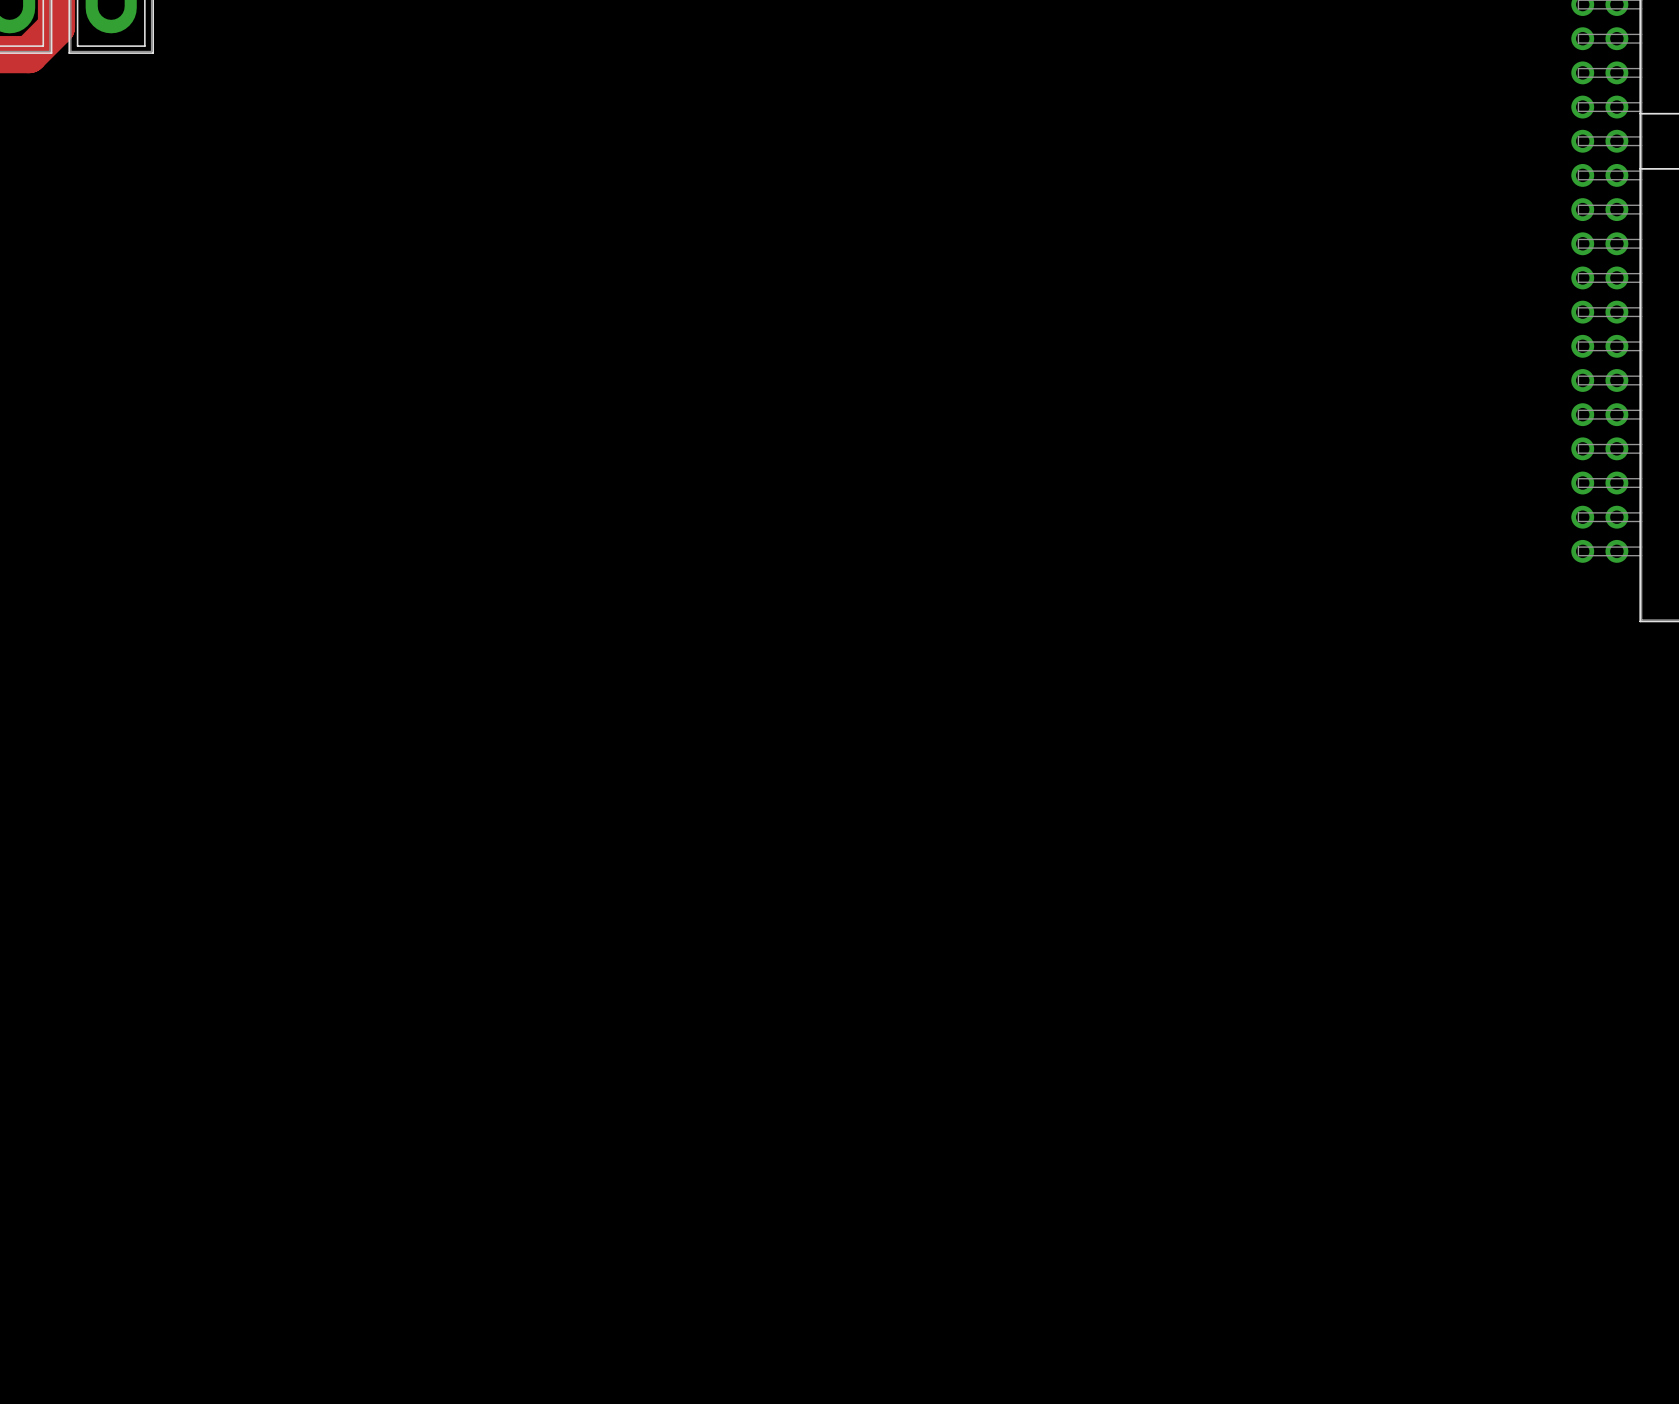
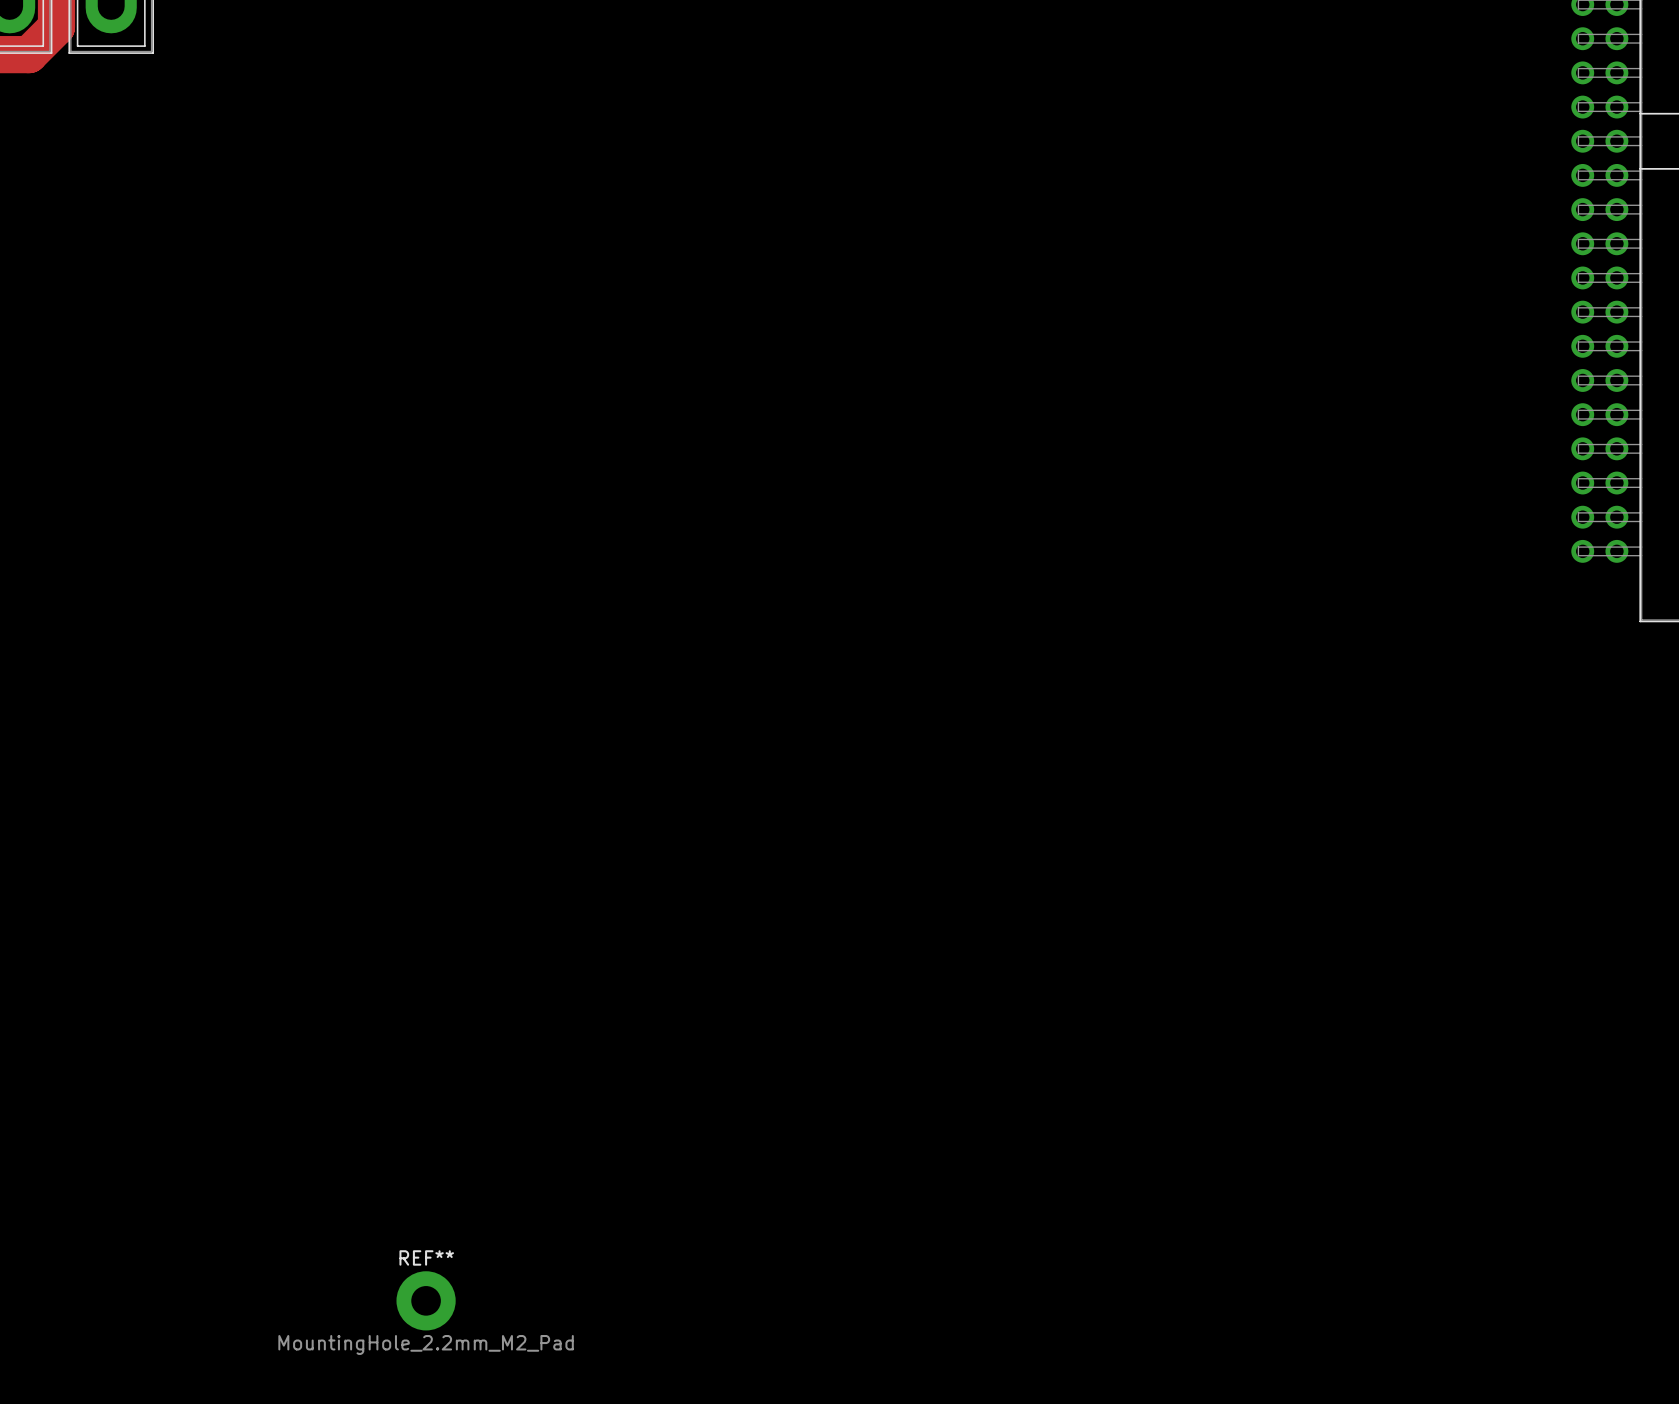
REF**: none -> MountingHole_2.2mm_M2_Pad (426, 1300)

